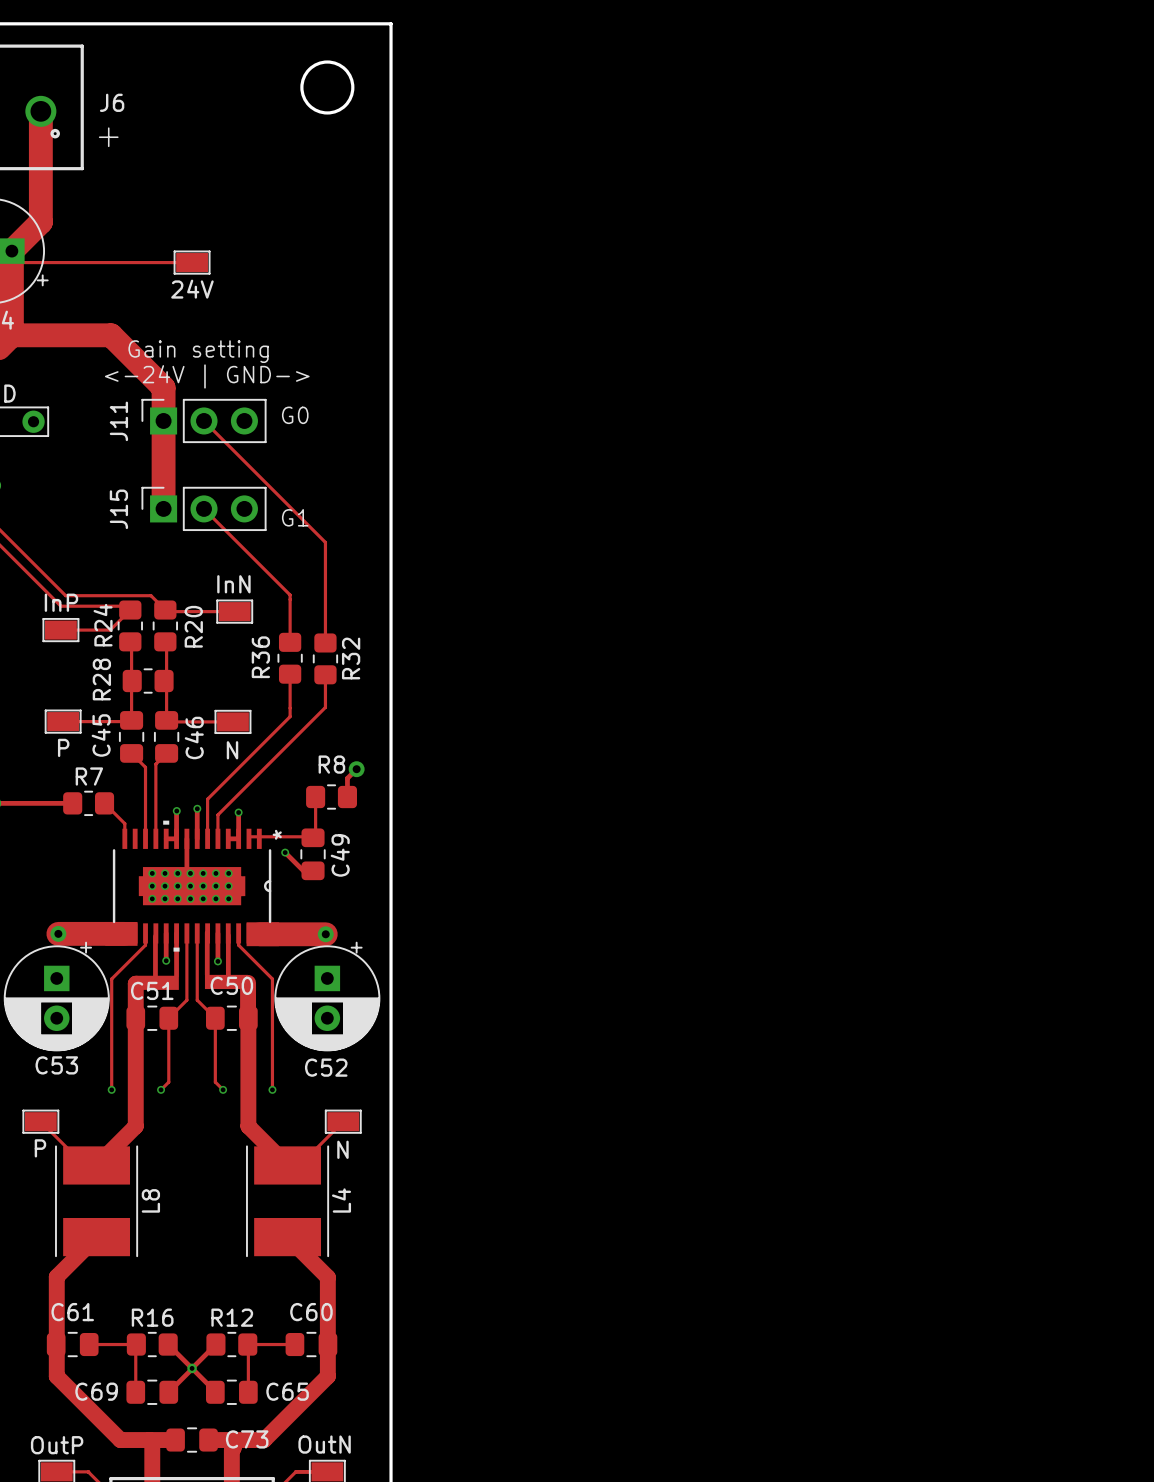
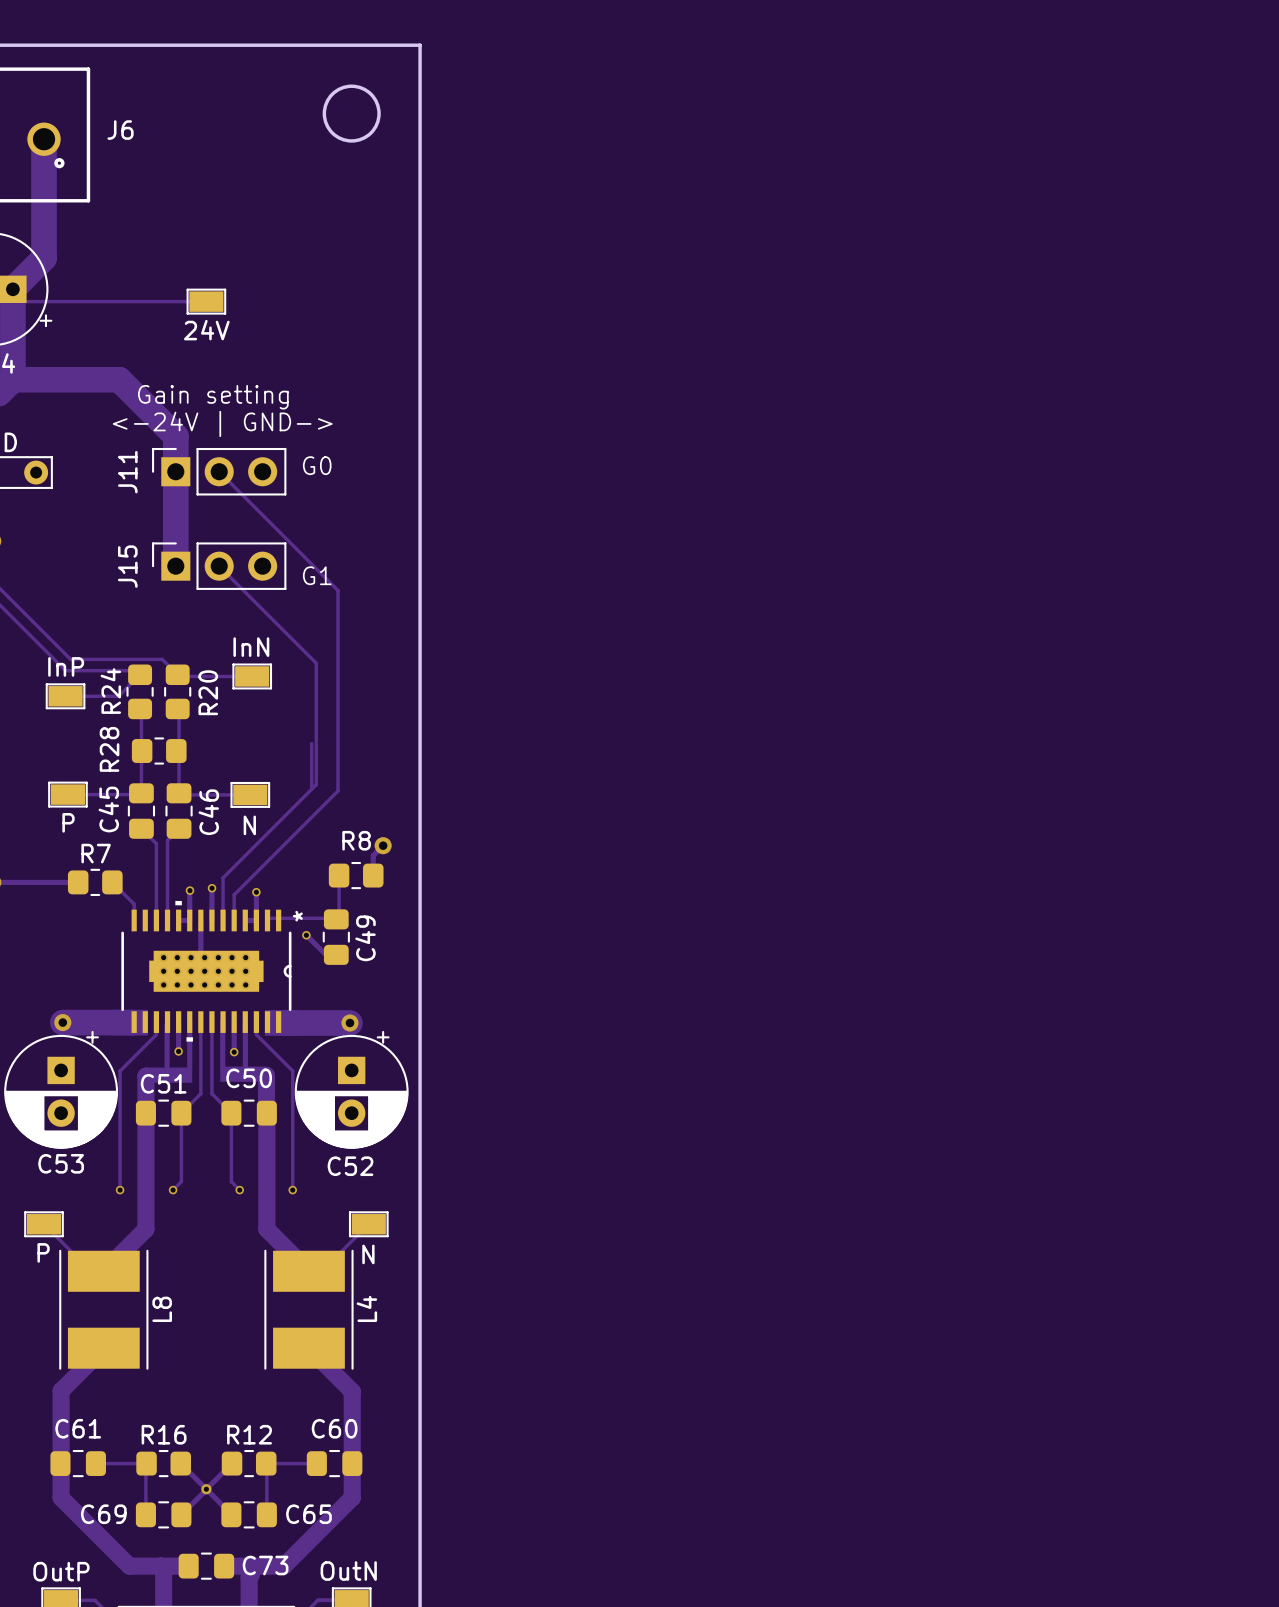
text: + (108, 137) -> none
track: (314, 531) (325, 542) (325, 642) -> (338, 590) (338, 791)
track: (290, 595) (290, 642) -> (311, 658) (316, 663) (316, 784) (311, 789)
R36: (290, 658) -> none
R32: (325, 658) -> none
track: (325, 674) (325, 707) (314, 718) -> none

